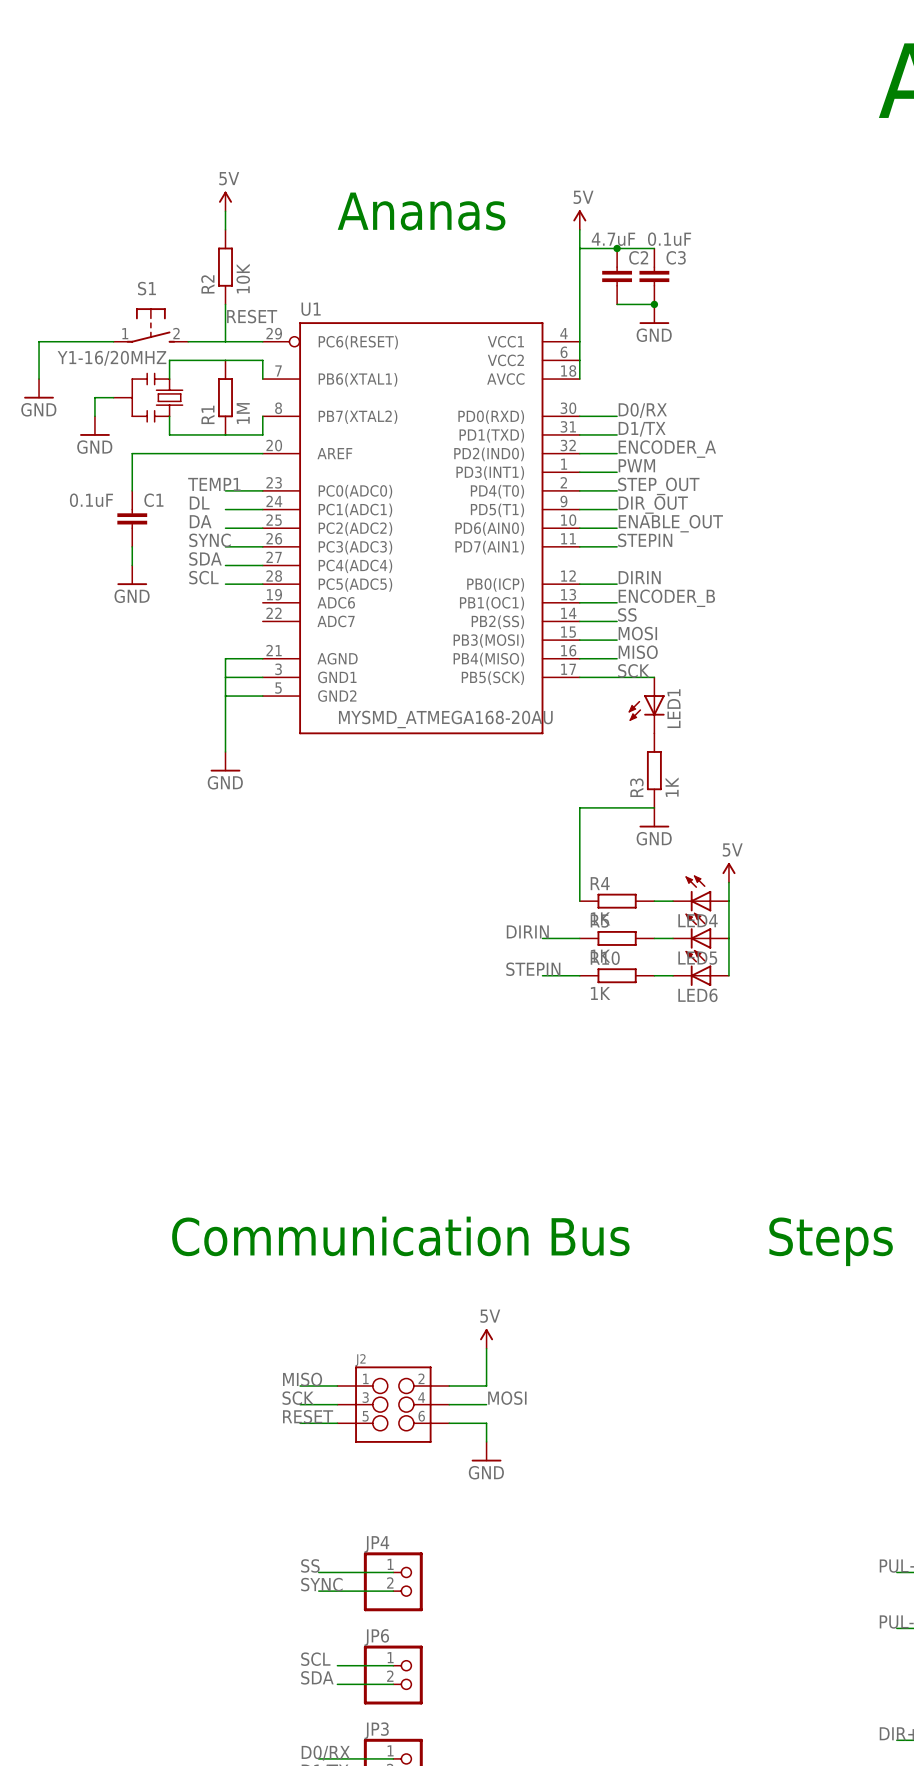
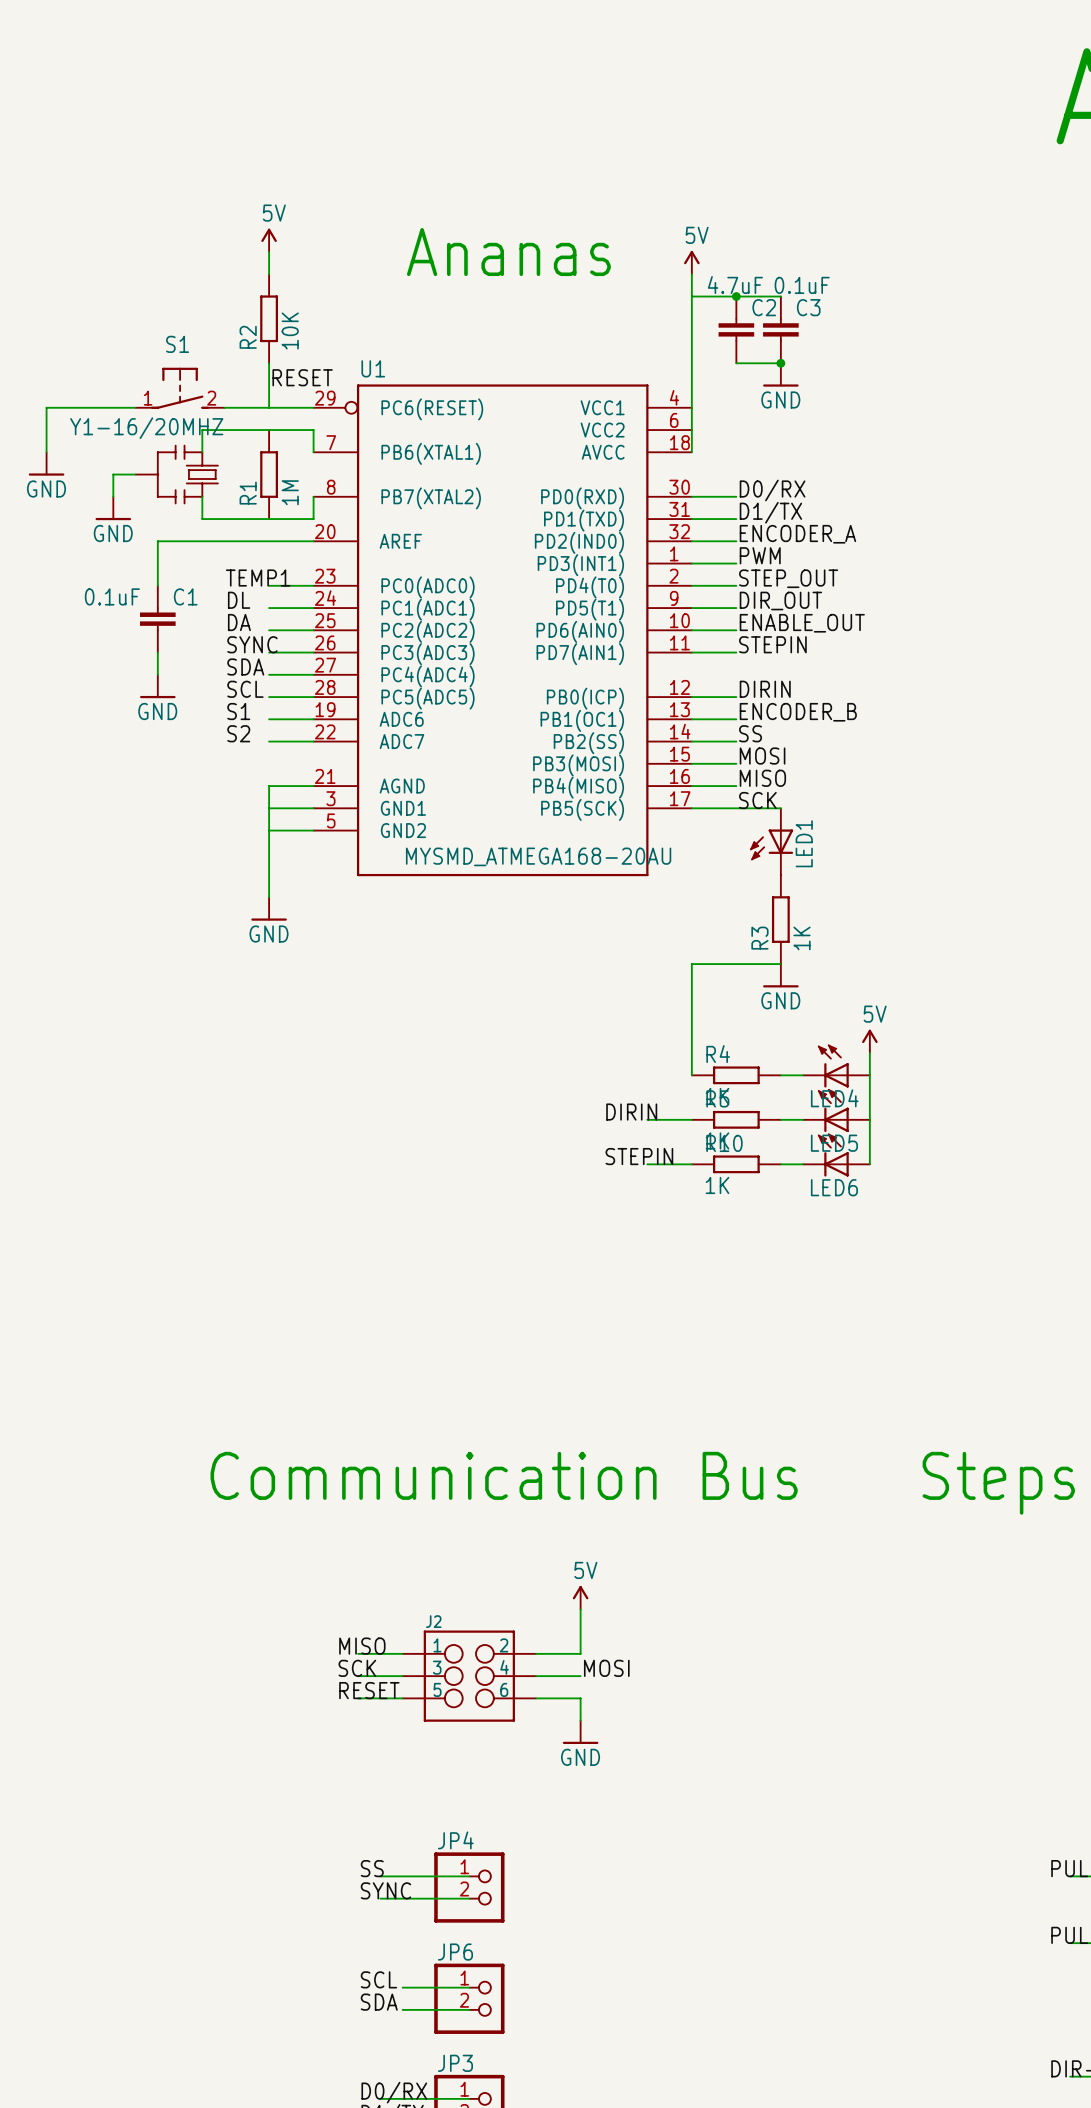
label: none -> S1 (238, 711)
wire: none -> (269, 719) (313, 719)
label: none -> S2 (238, 733)
wire: none -> (269, 741) (313, 741)

